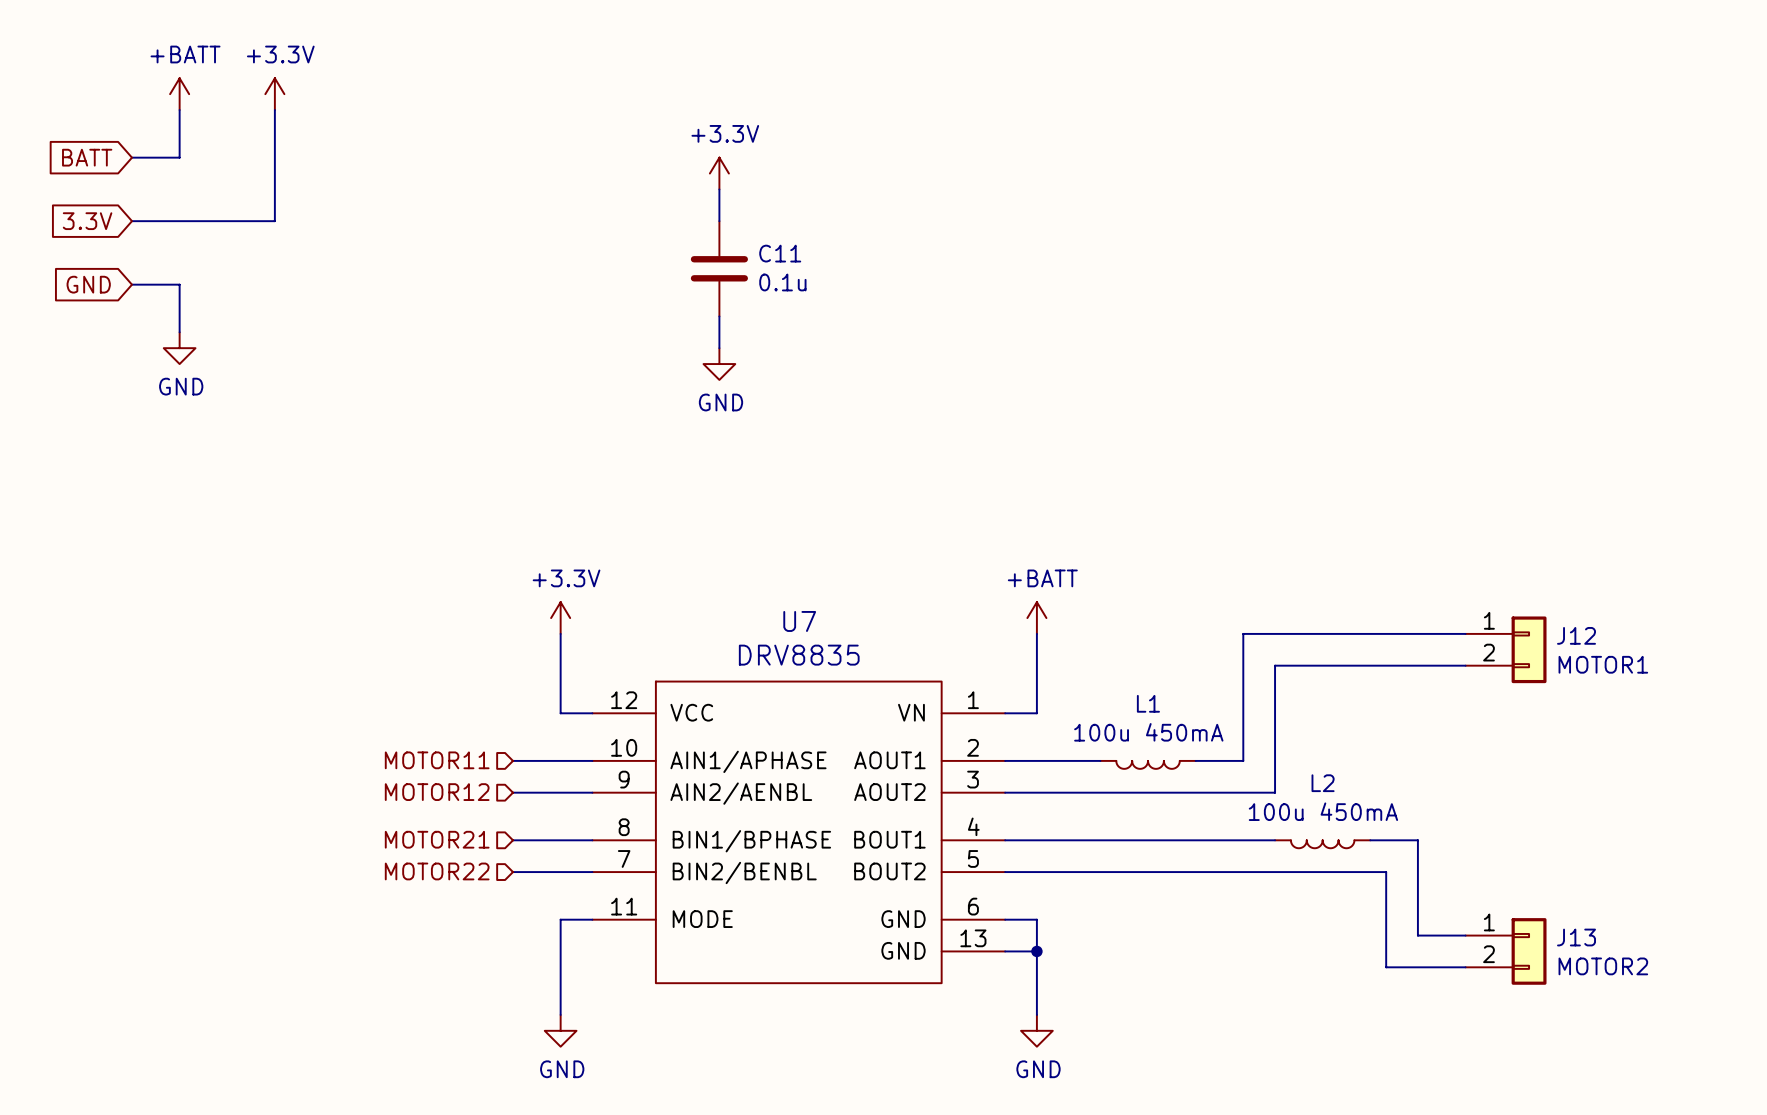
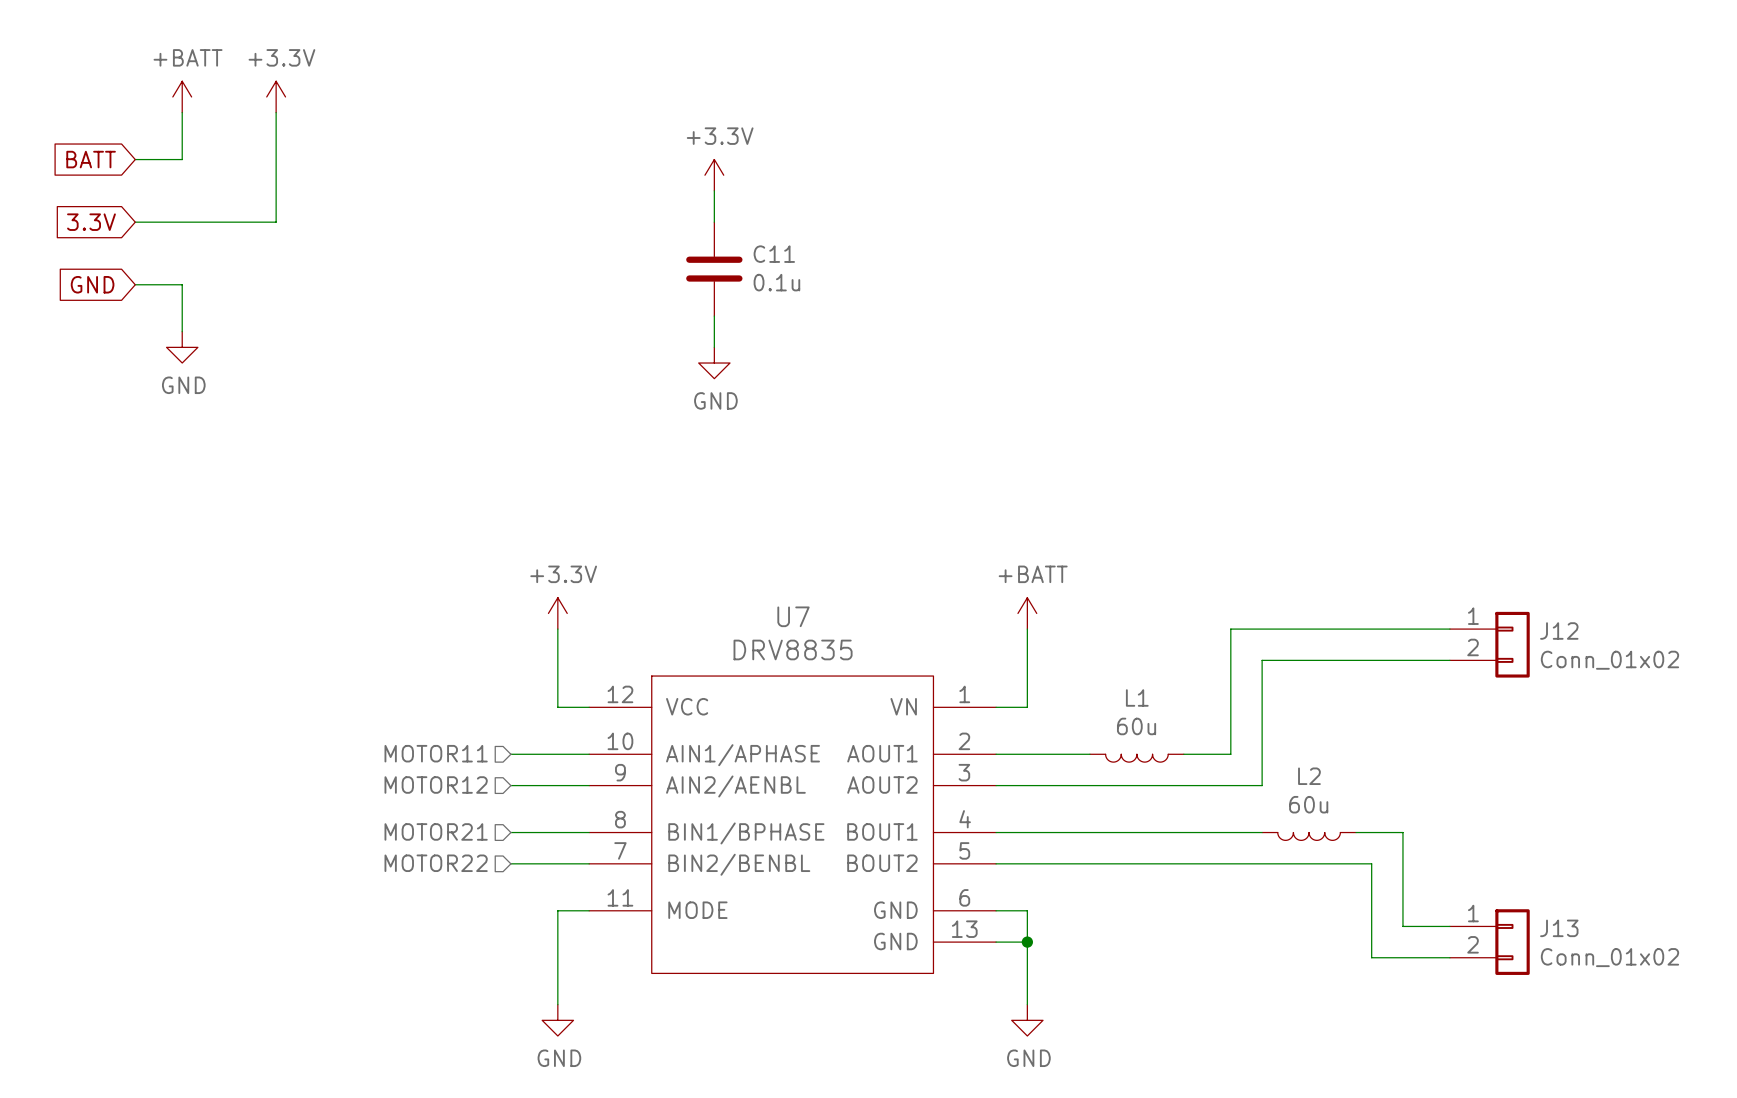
J12 value: MOTOR1 (1603, 664) -> Conn_01x02 (1609, 660)
L1 value: 100u 450mA (1148, 732) -> 60u (1136, 726)
L2 value: 100u 450mA (1323, 811) -> 60u (1308, 804)
J13 value: MOTOR2 (1603, 966) -> Conn_01x02 (1609, 957)

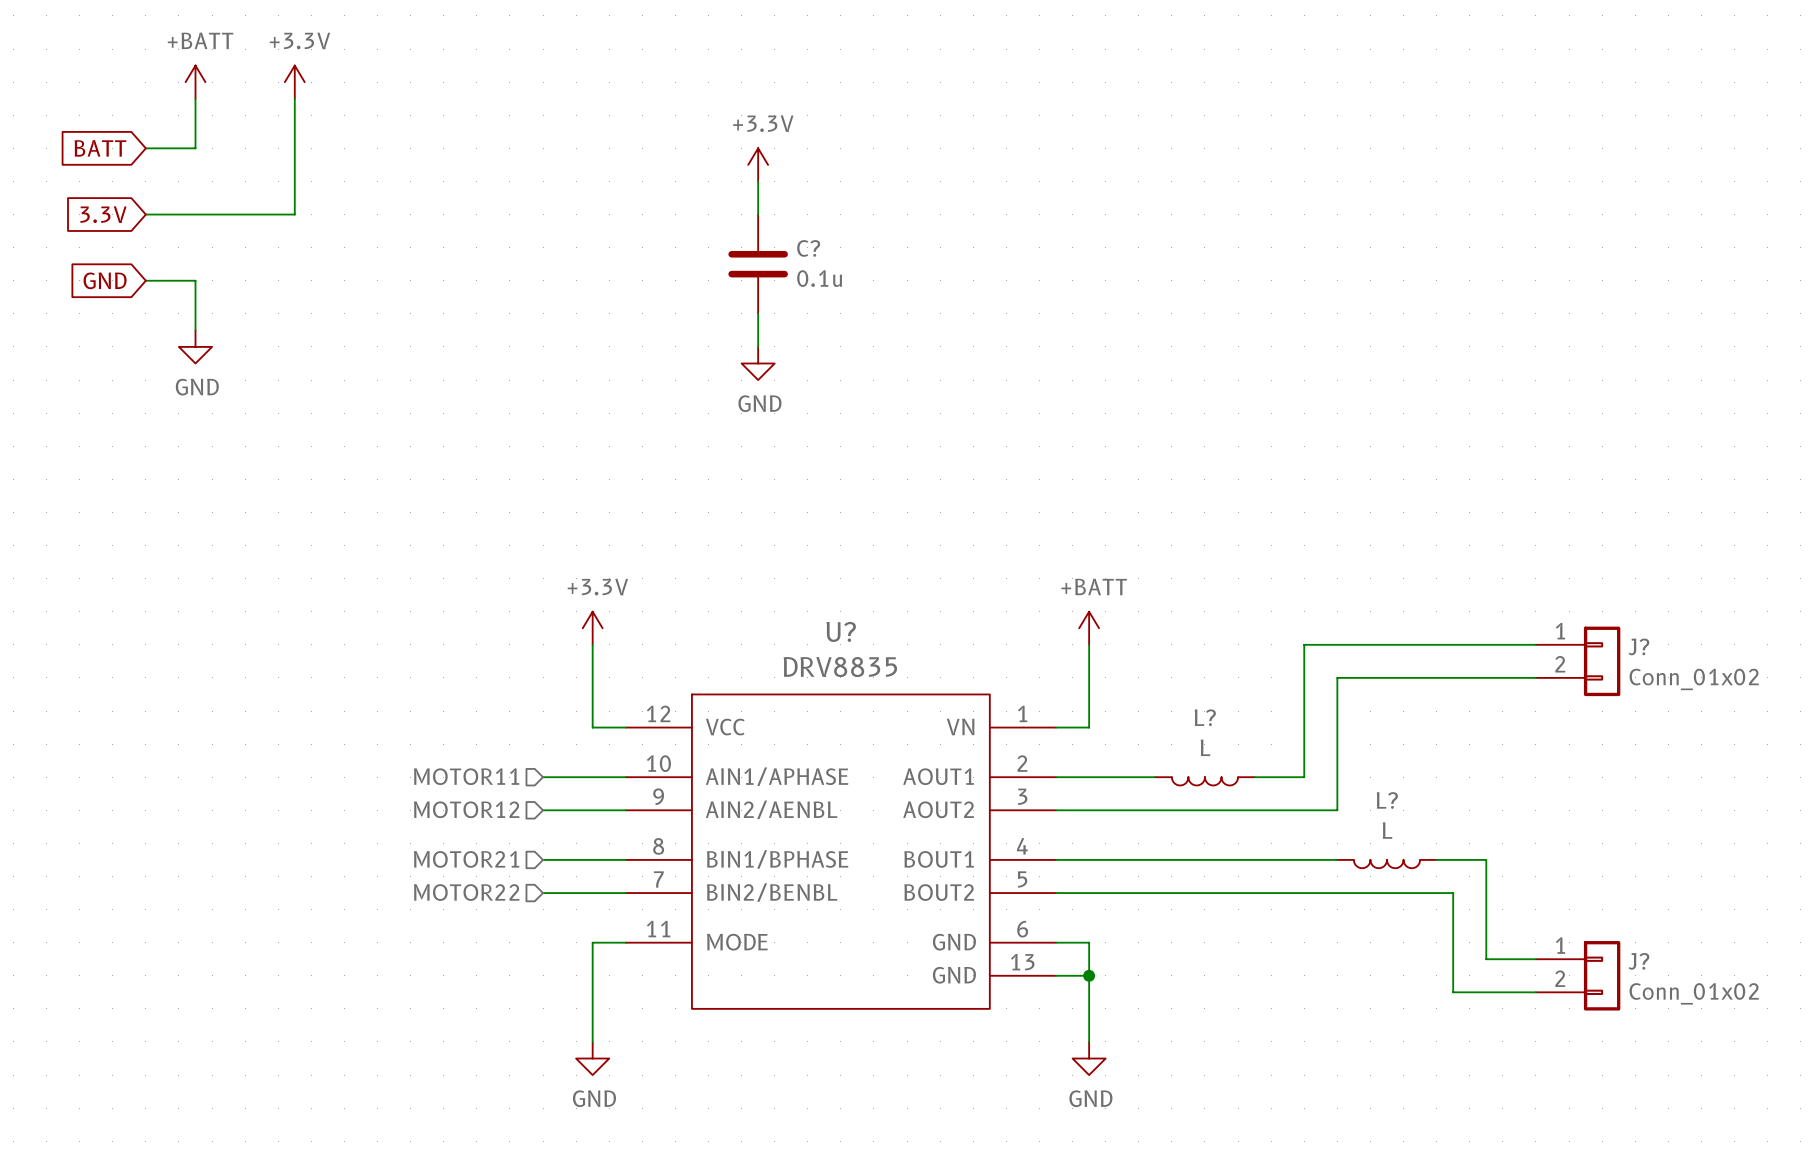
C11 name: C11 (774, 254) -> C? (808, 248)
U7 name: U7 (793, 616) -> U? (841, 631)
J12 name: J12 (1559, 631) -> J? (1638, 646)
L1 name: L1 (1137, 697) -> L? (1205, 717)
L1 value: 60u (1136, 726) -> L (1205, 747)
L2 name: L2 (1309, 776) -> L? (1387, 800)
L2 value: 60u (1308, 804) -> L (1387, 830)
J13 name: J13 (1559, 928) -> J? (1638, 961)

